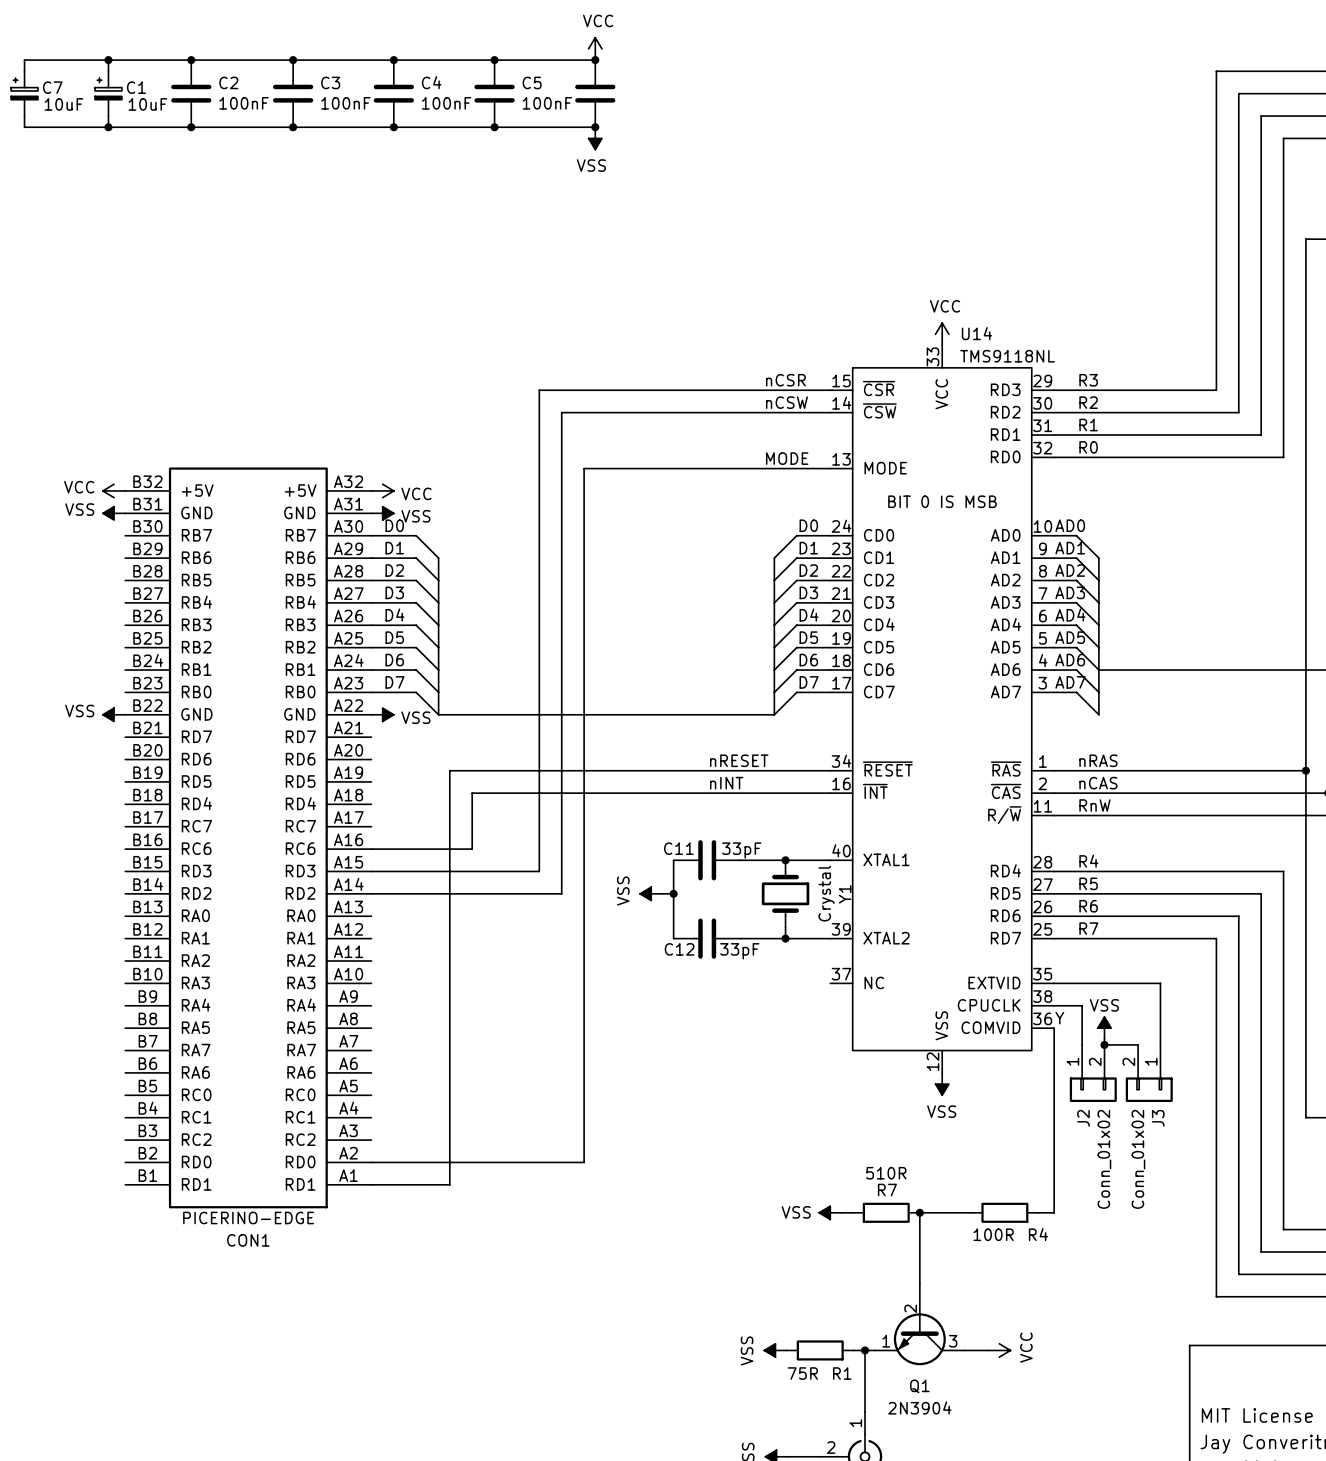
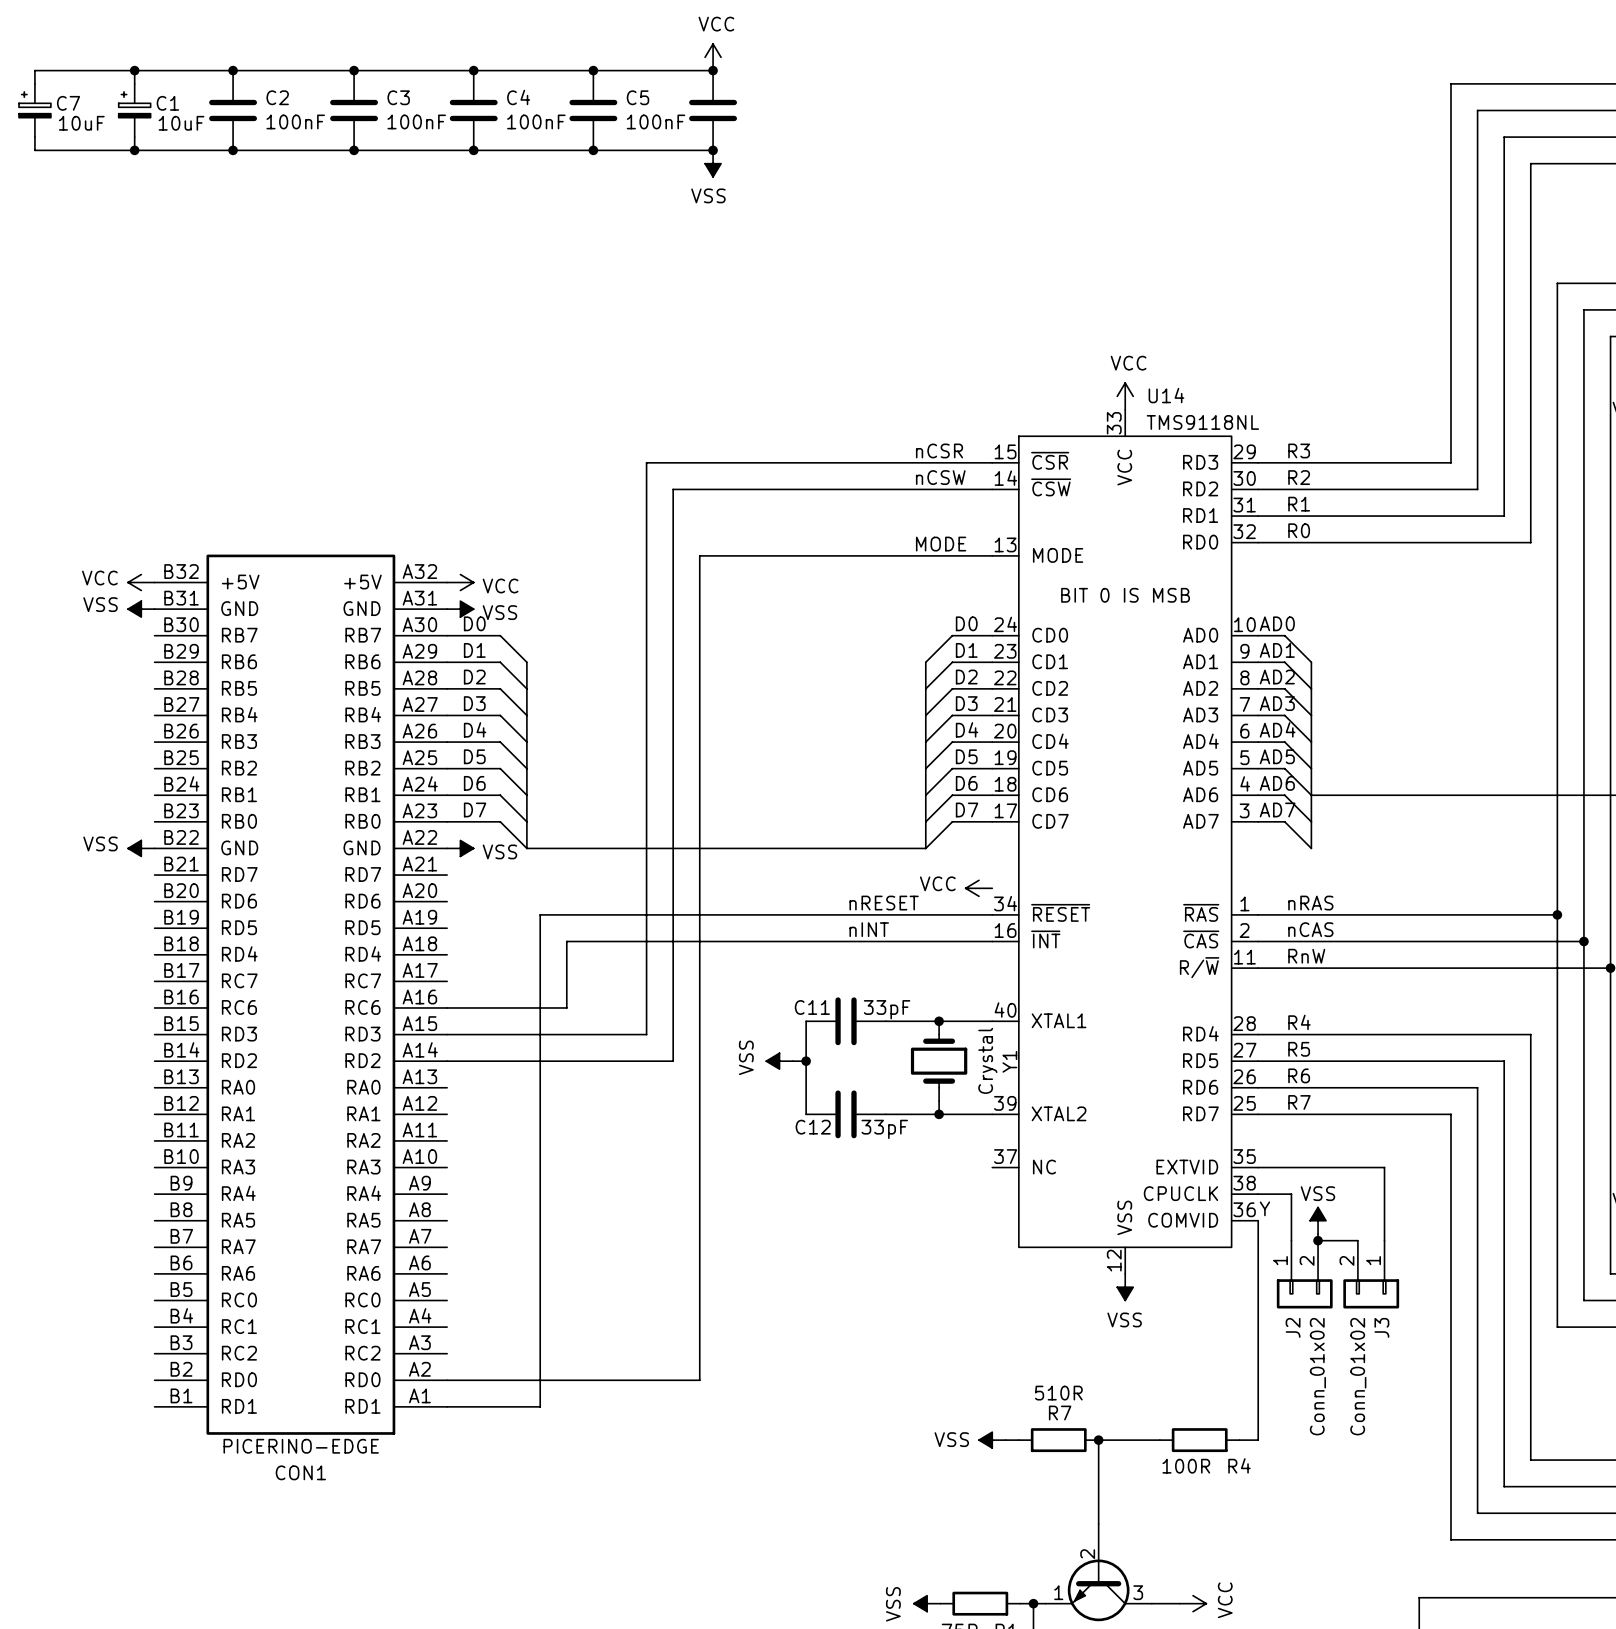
power symbol: none -> VCC (978, 888)

